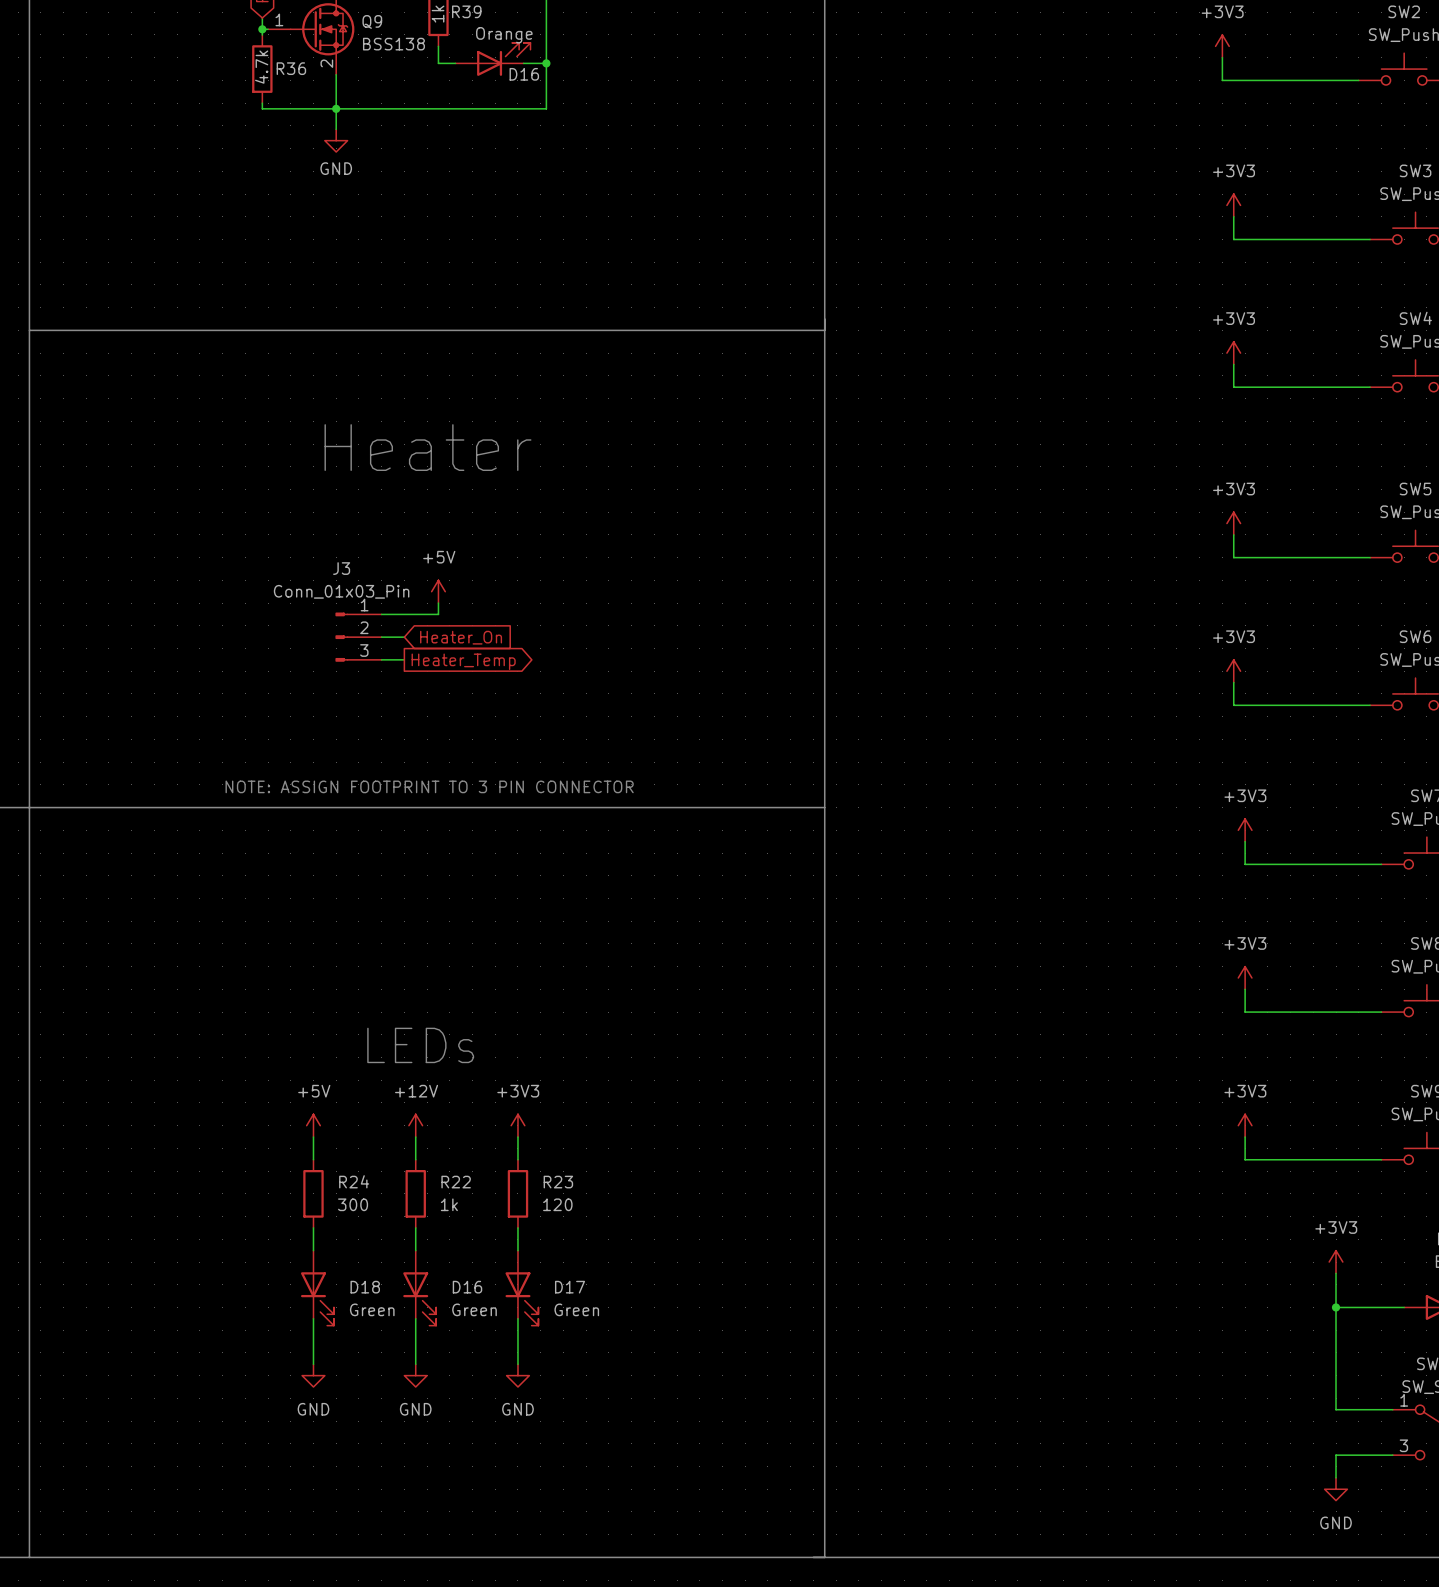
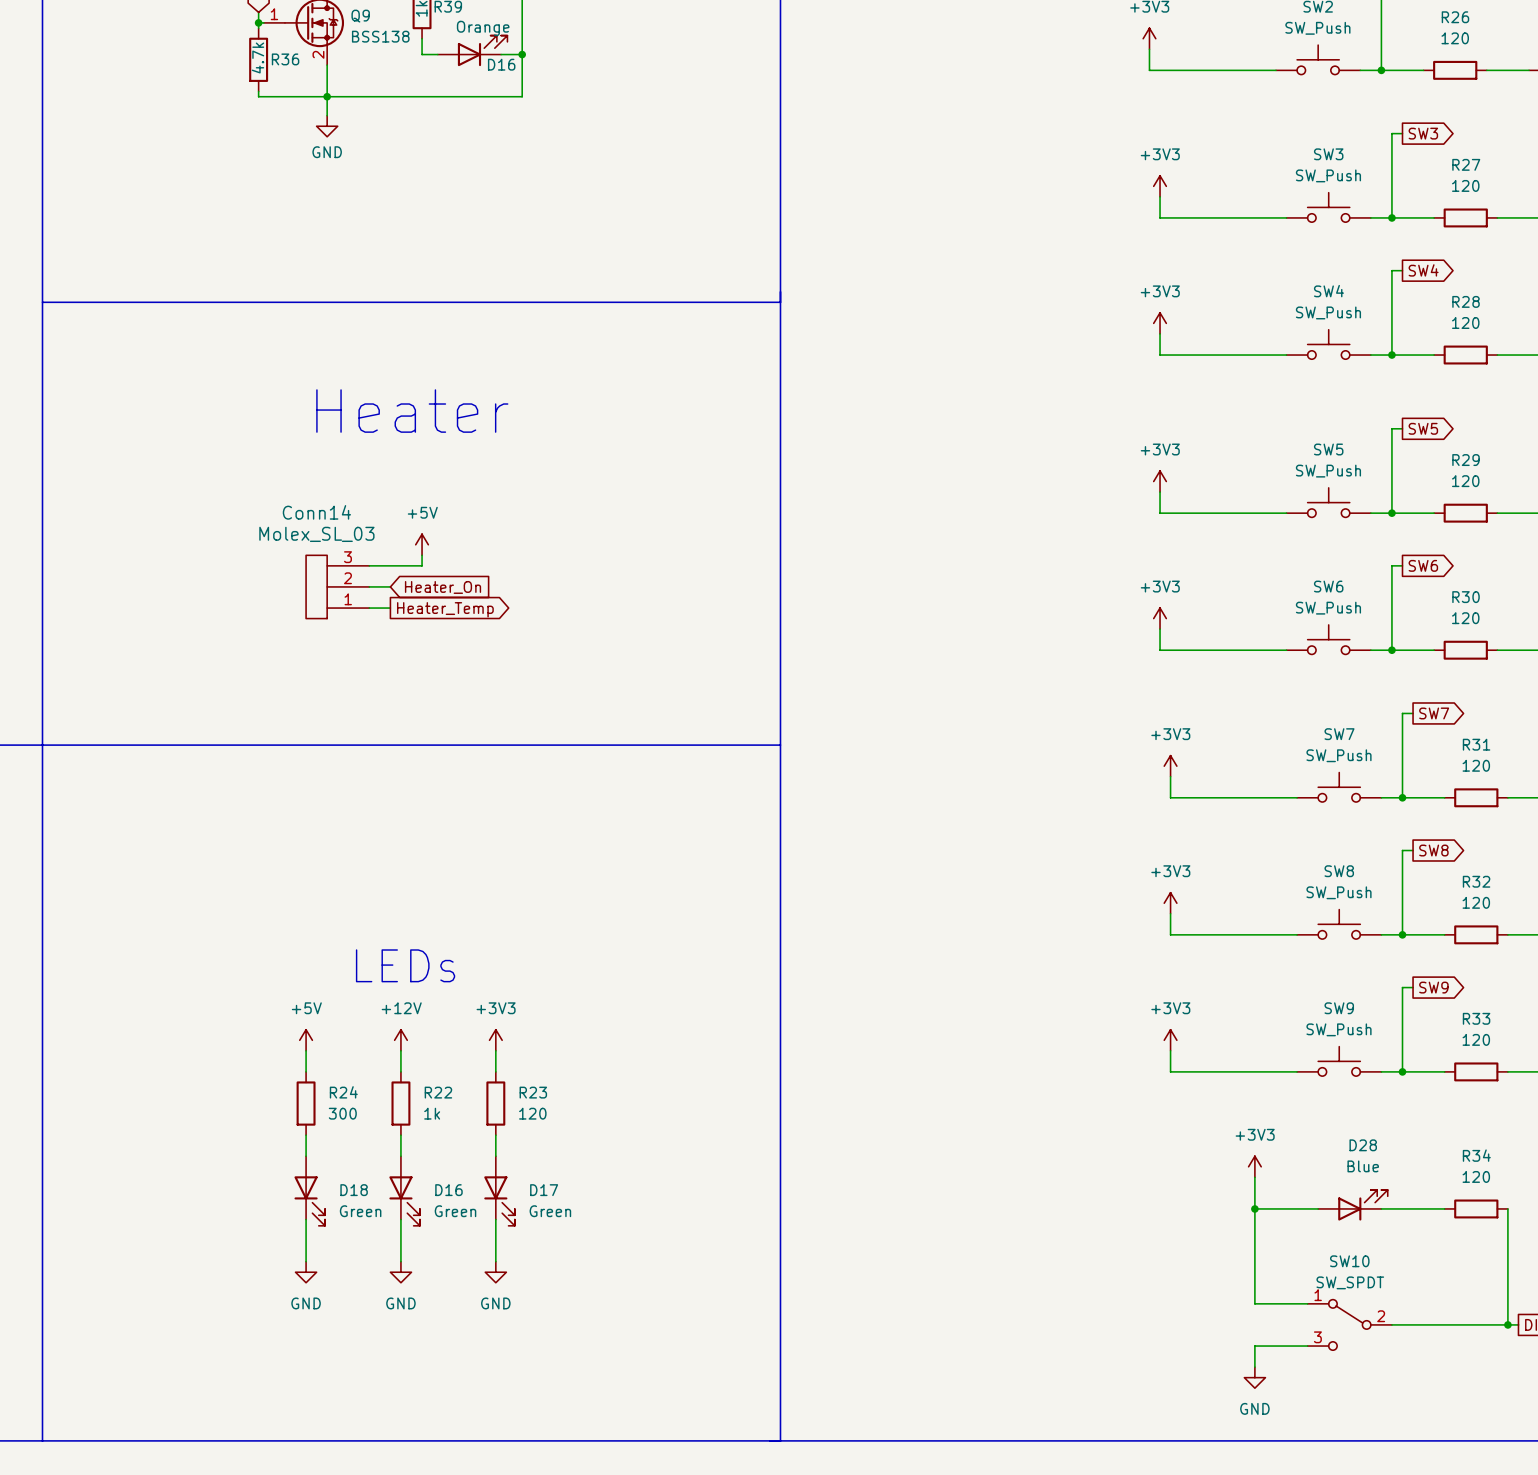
Conn14: none -> Molex_SL_03 (337, 586)
J3: Conn_01x03_Pin (358, 637) -> none
text: NOTE: ASSIGN FOOTPRINT TO 3 PIN CONNECTOR (429, 786) -> none

